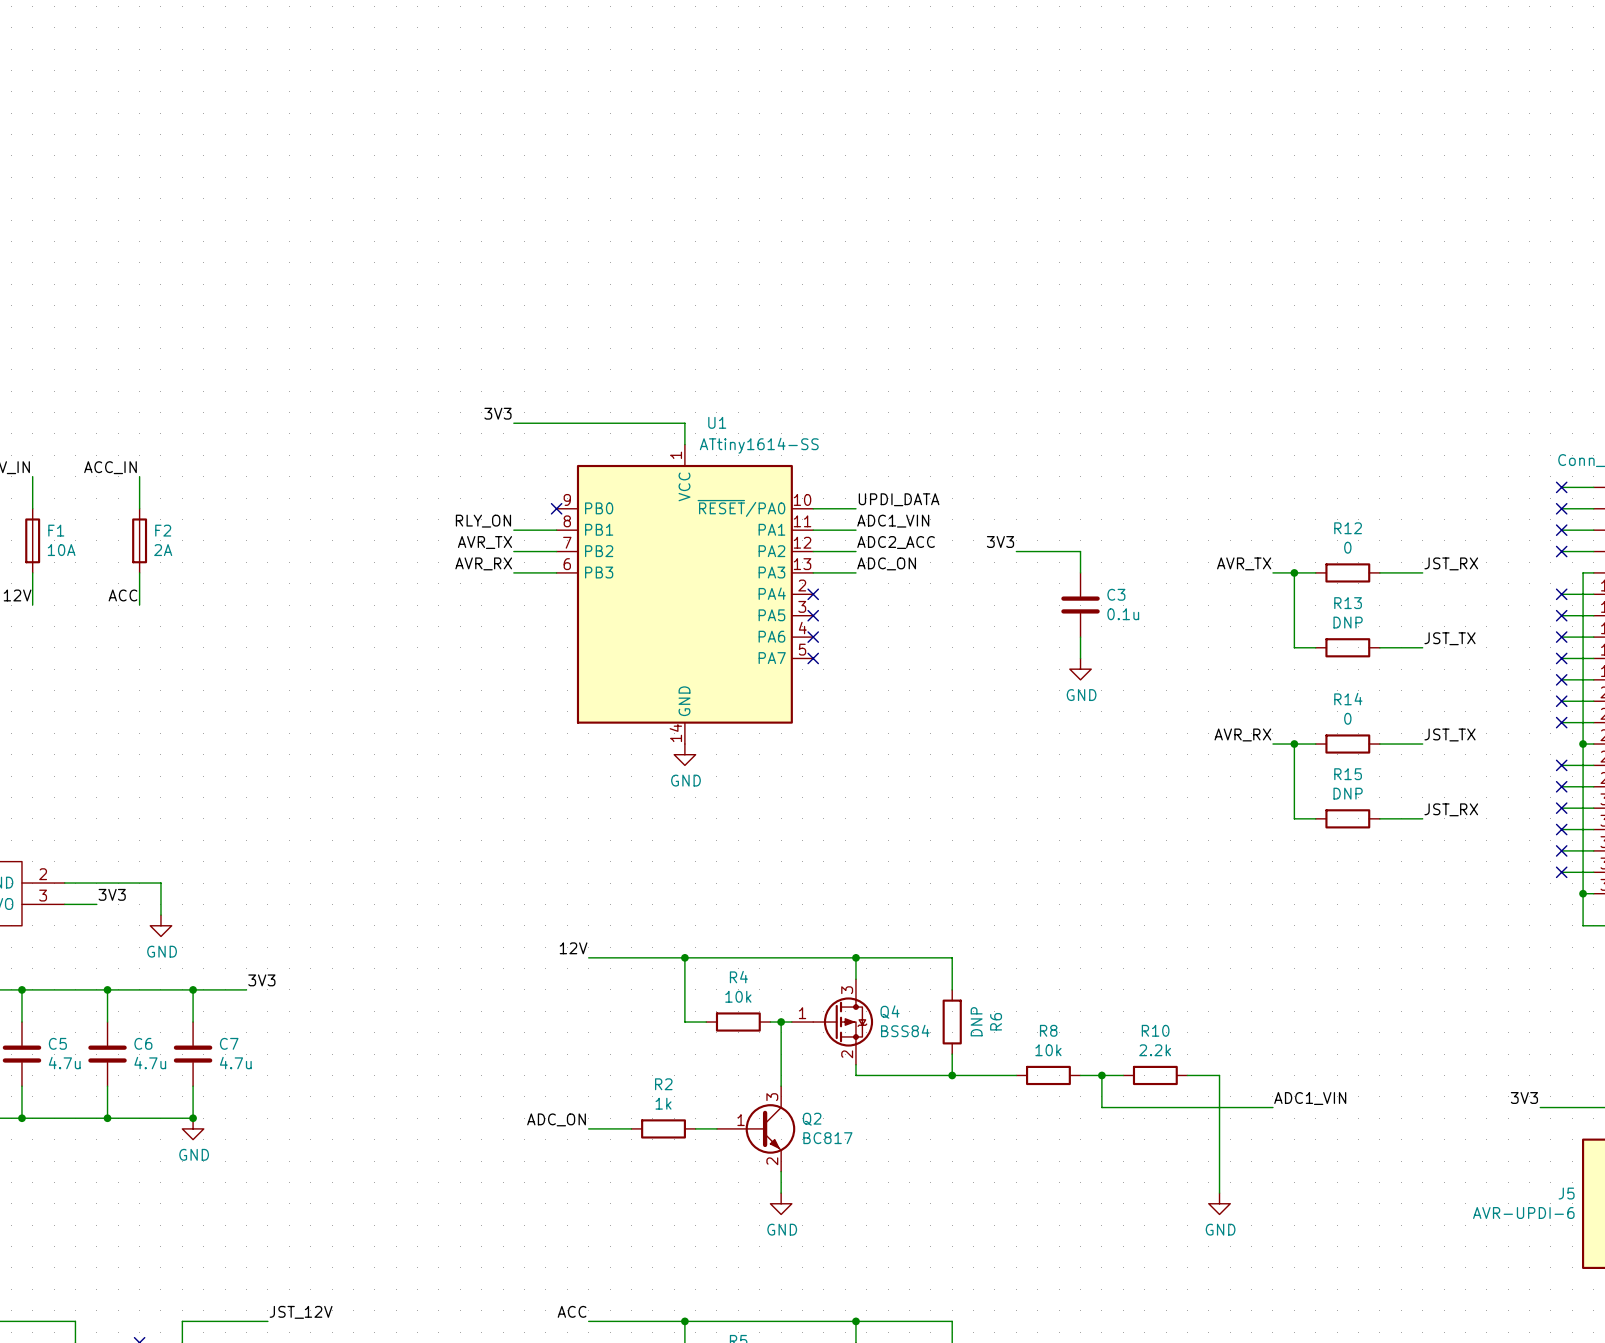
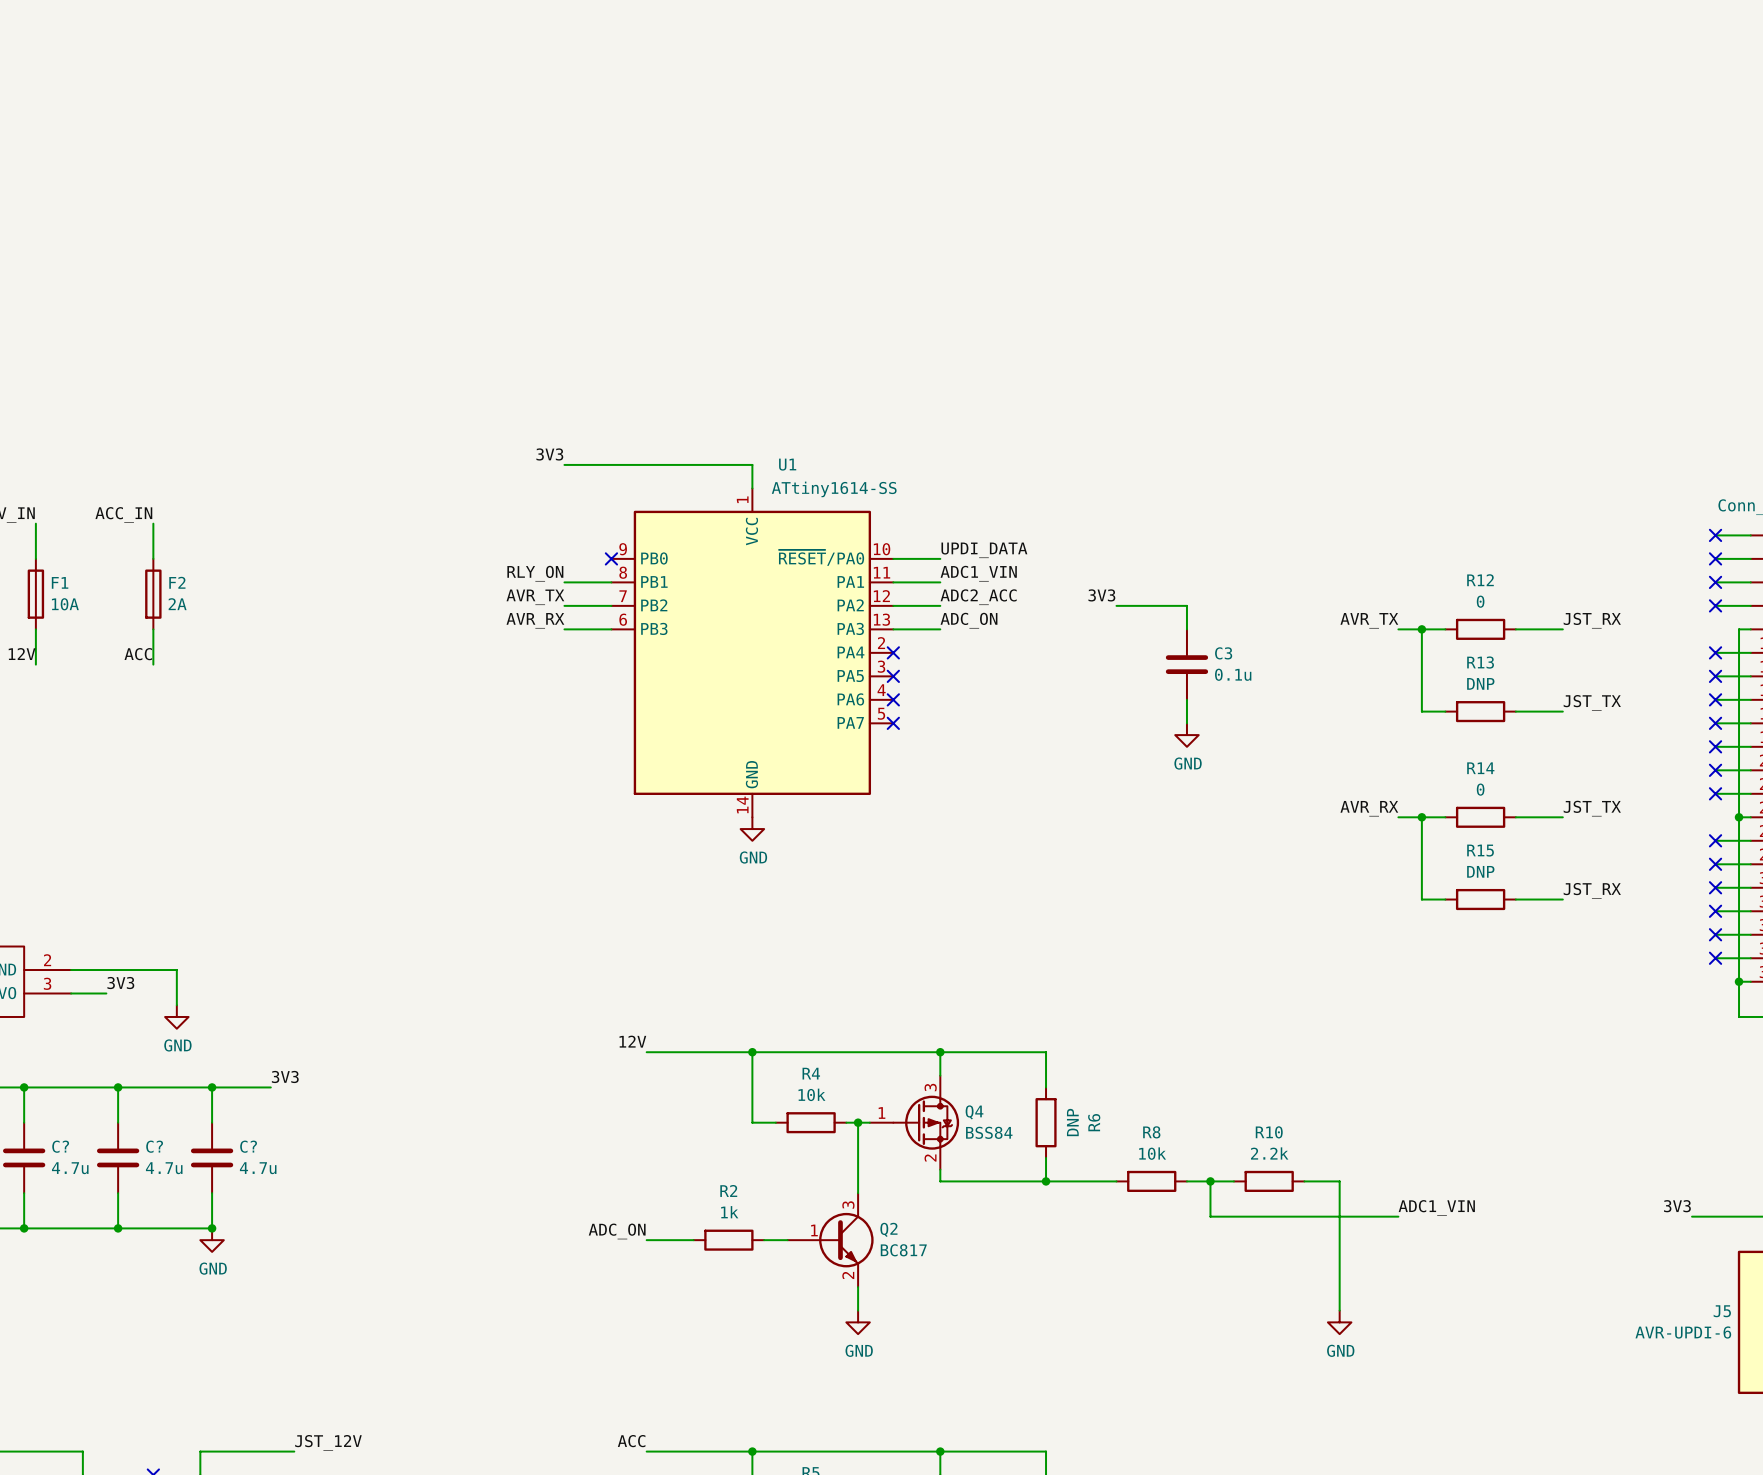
C5 name: C5 (57, 1043) -> C? (60, 1146)
C6 name: C6 (143, 1043) -> C? (154, 1146)
C7 name: C7 (229, 1043) -> C? (248, 1146)

